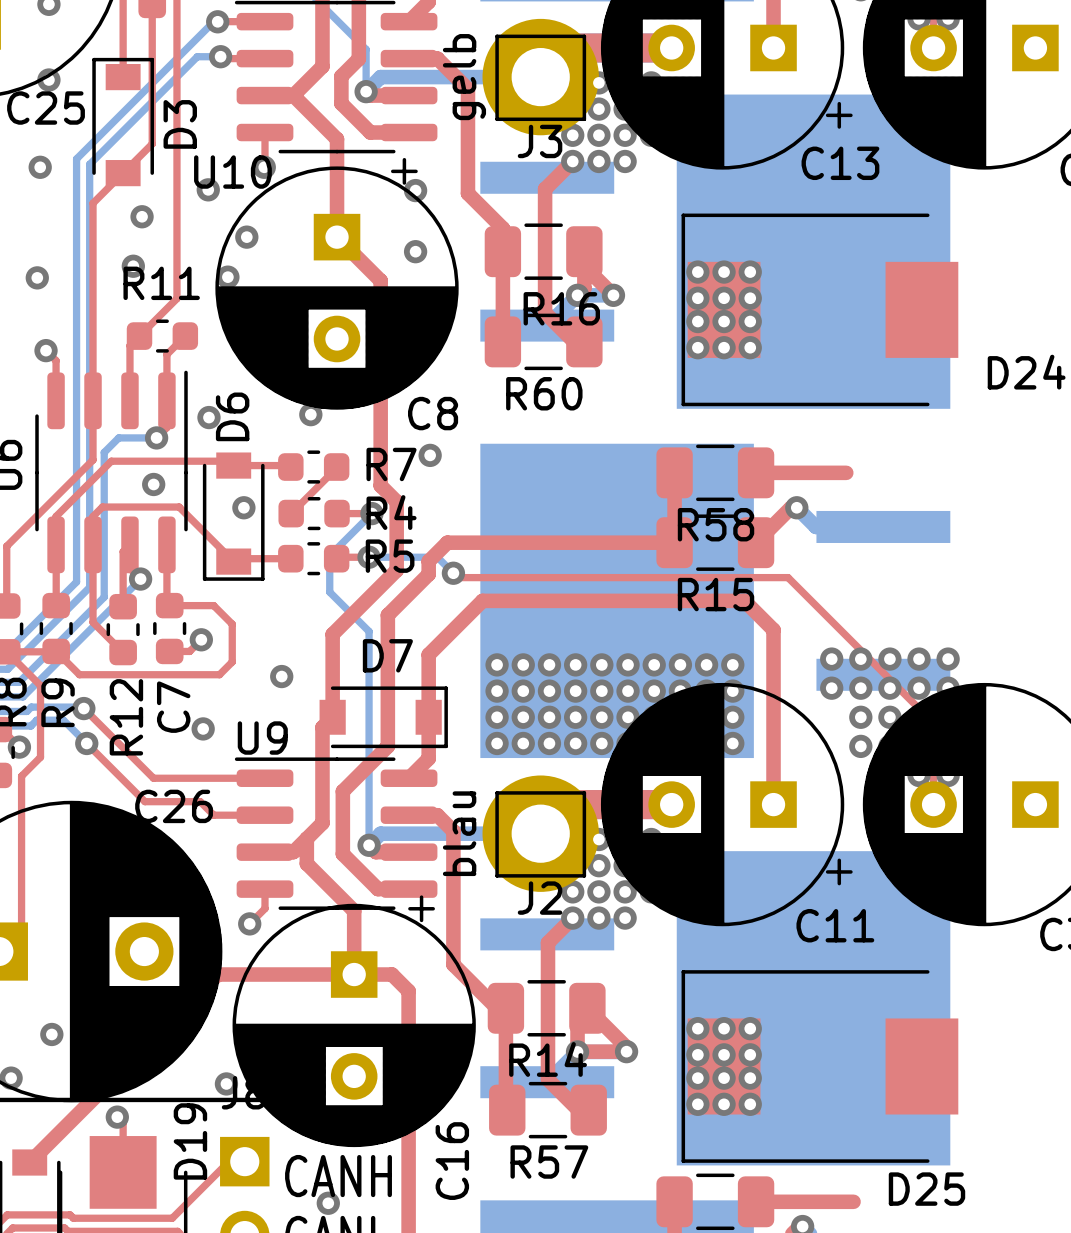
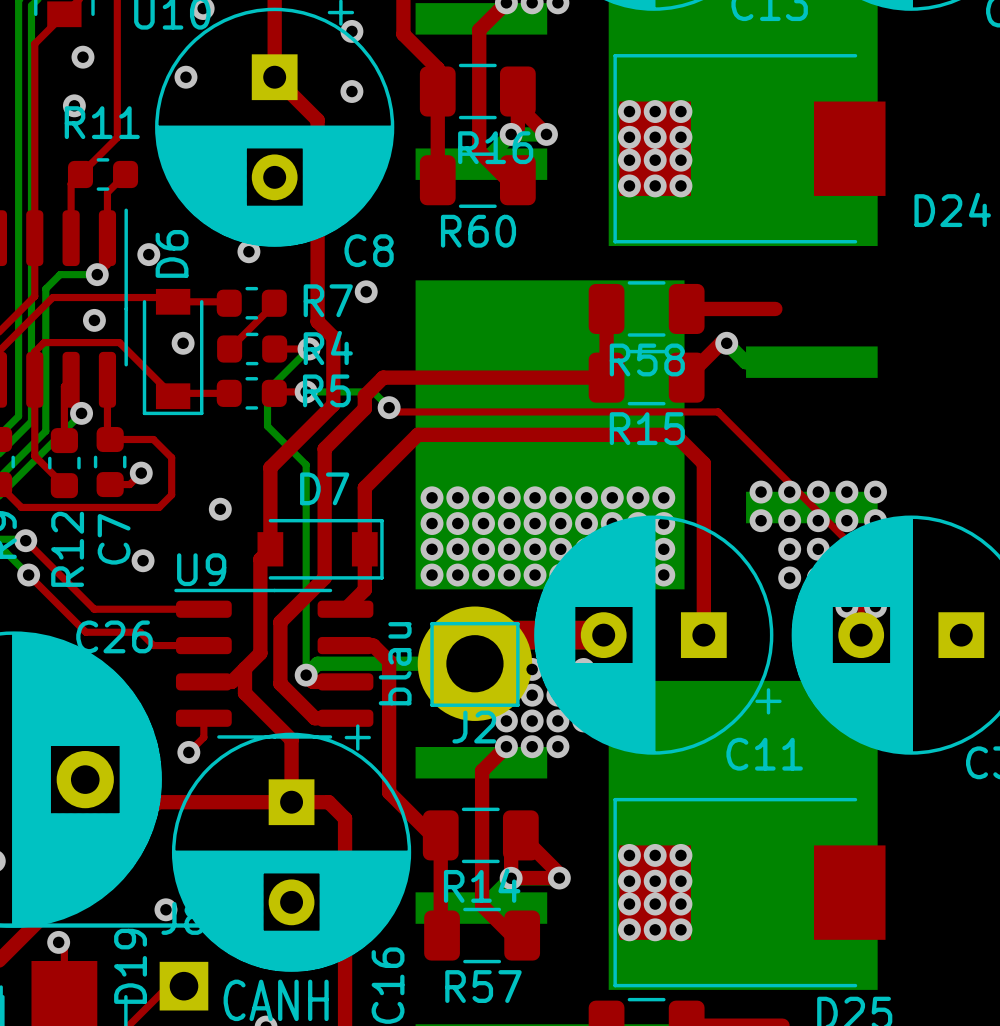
via: (208, 189) -> none
via: (227, 277) -> none

